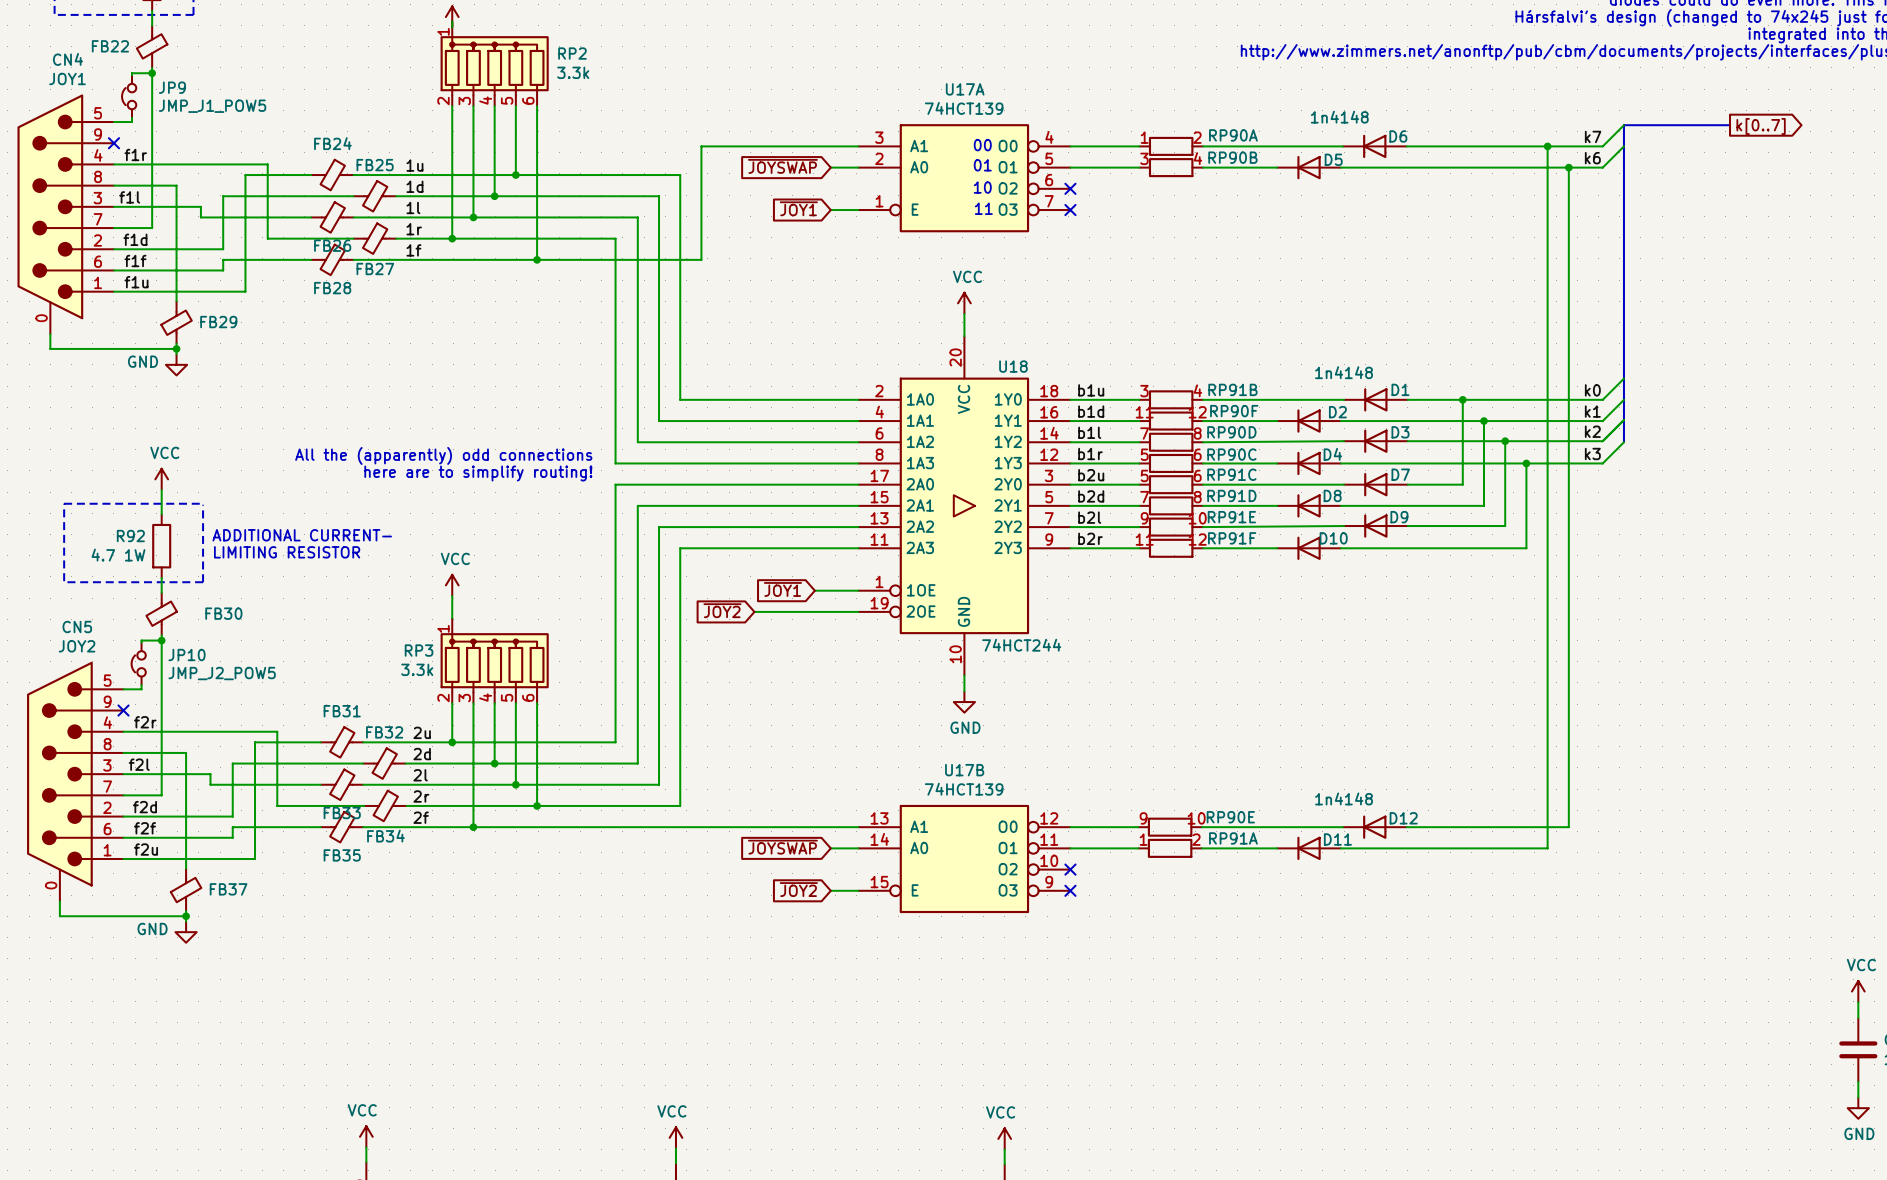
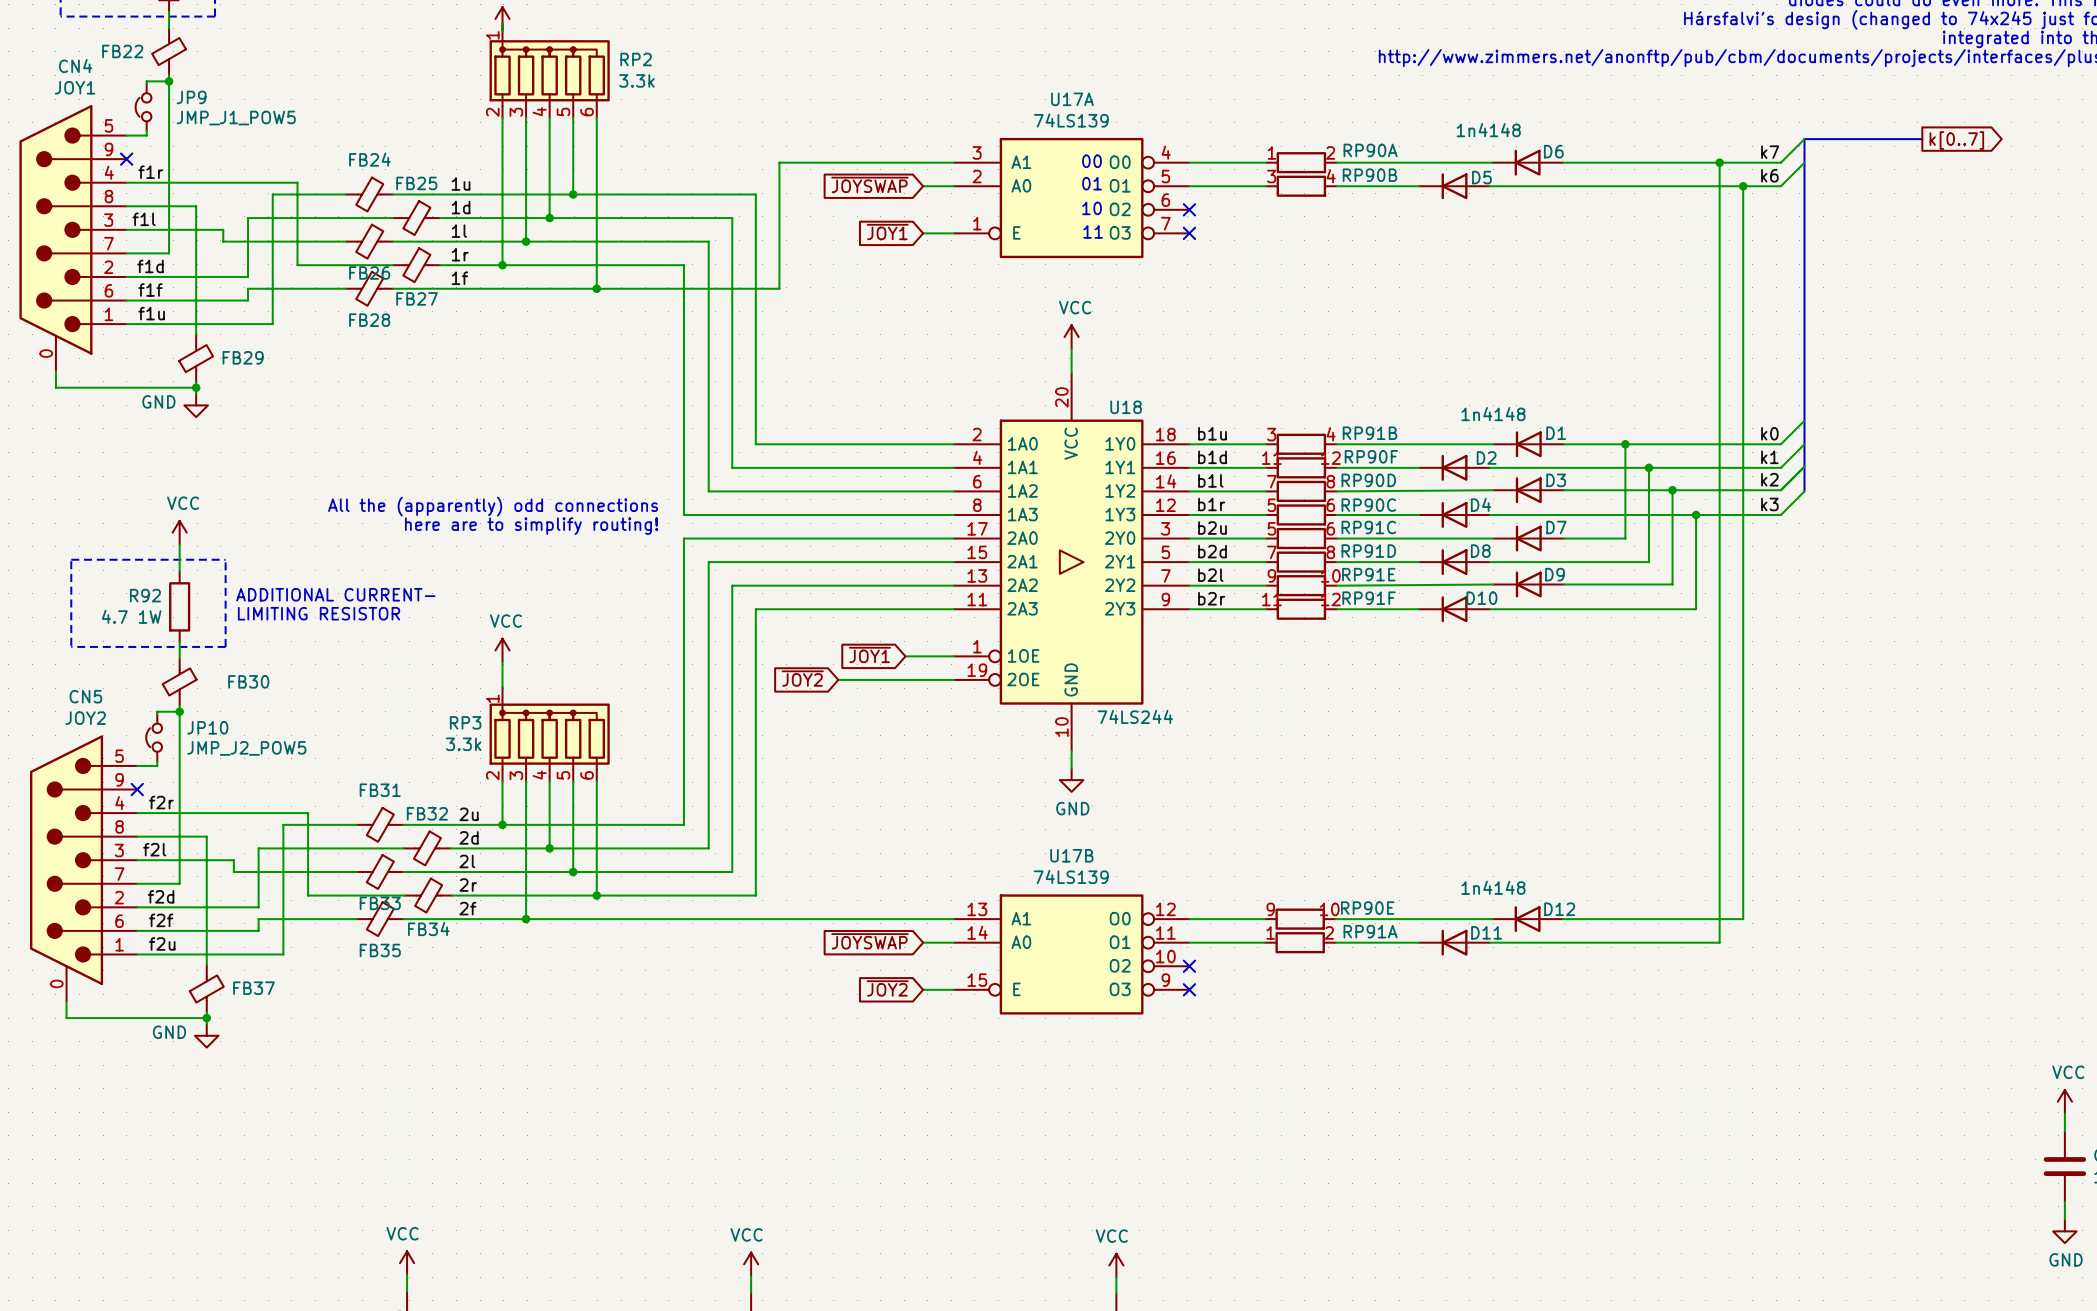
U17A value: 74HCT139 (964, 108) -> 74LS139 (1071, 120)
U18 value: 74HCT244 (1021, 645) -> 74LS244 (1135, 716)
U17B value: 74HCT139 (964, 789) -> 74LS139 (1071, 876)

